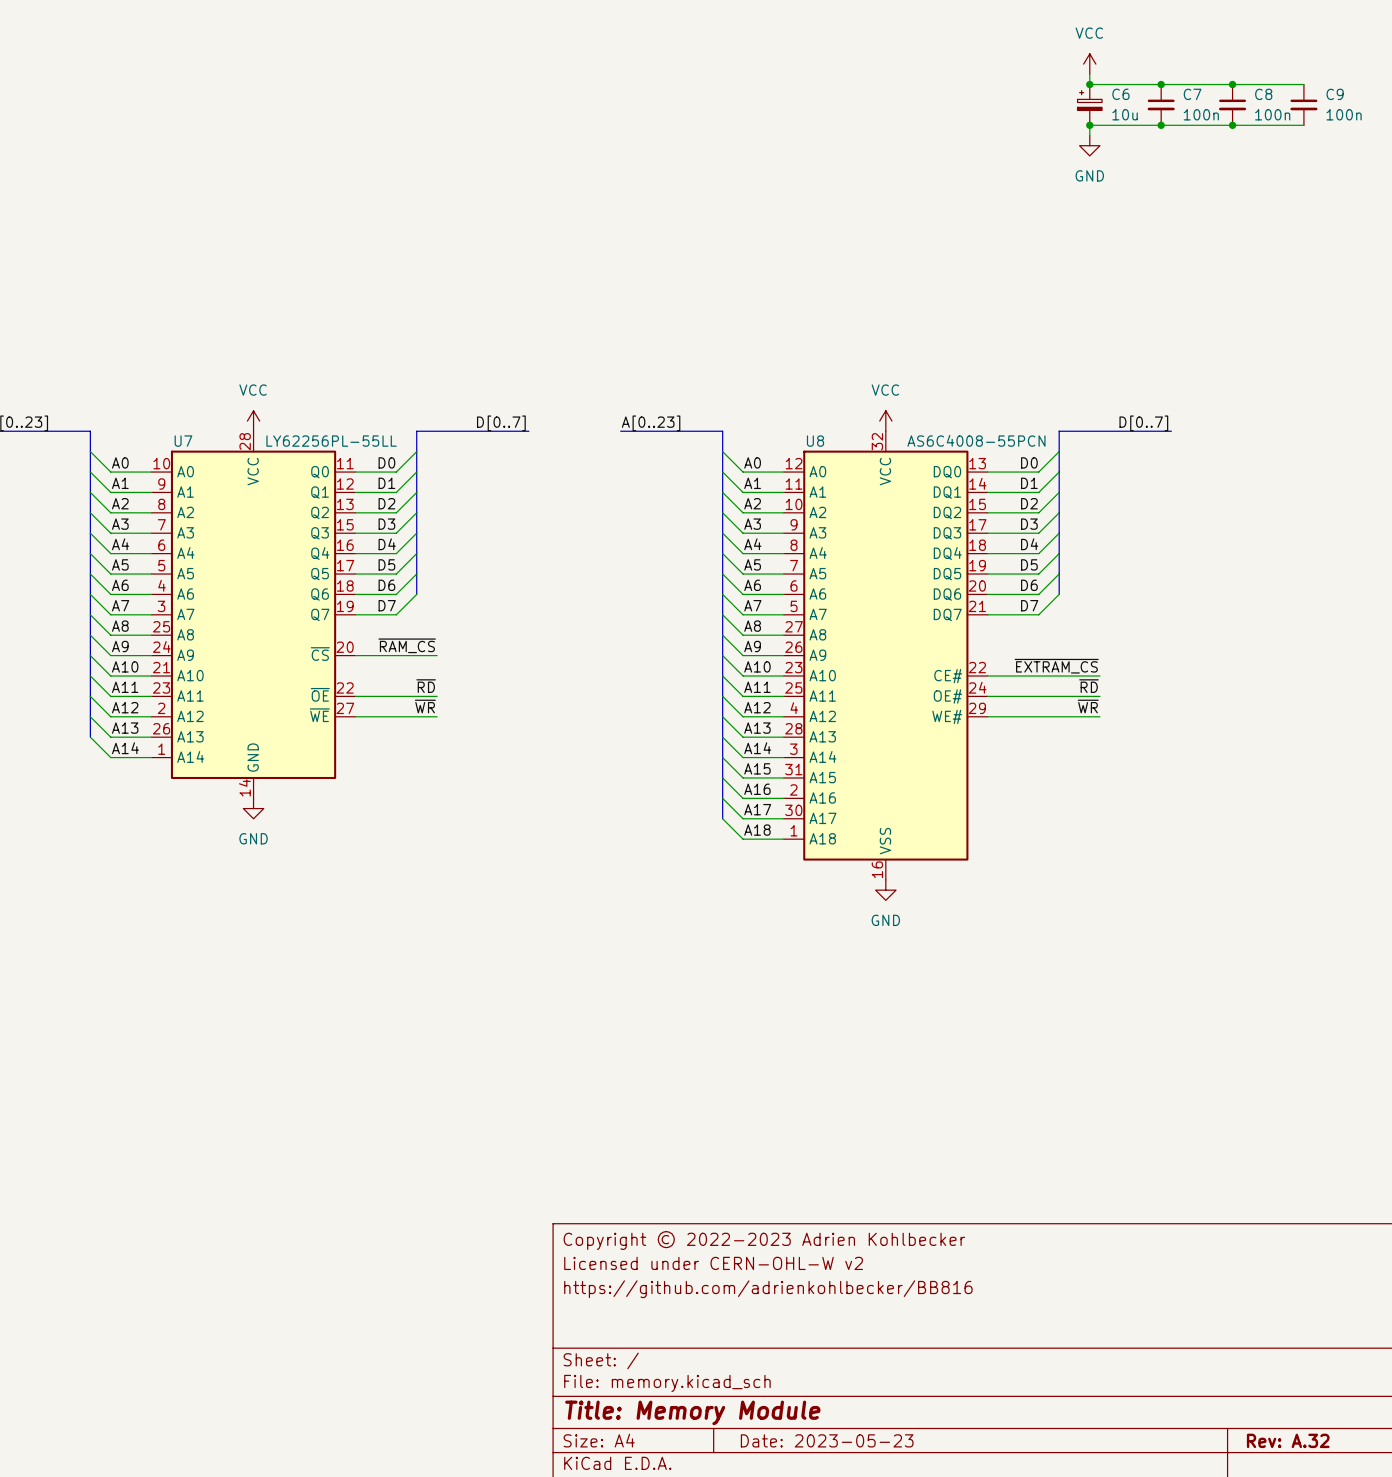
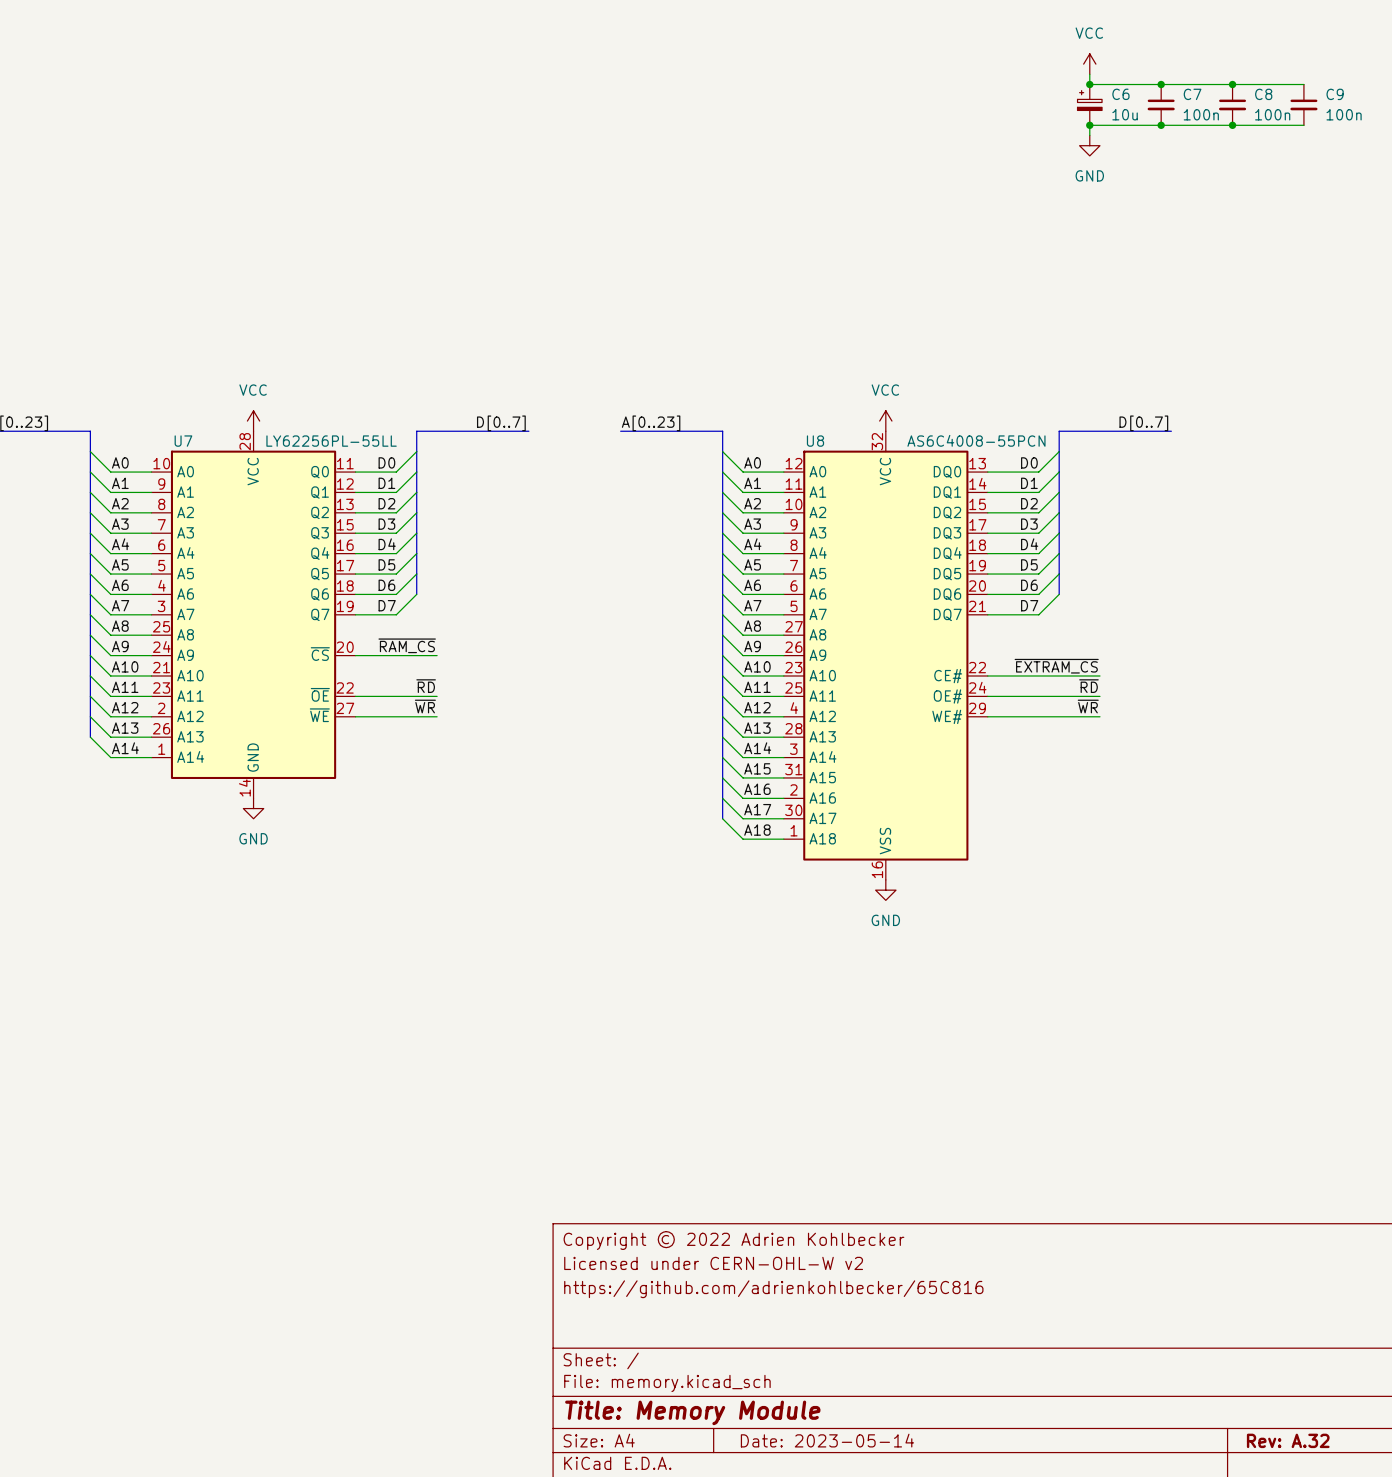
title block: Copyright © 2022-2023 Adrien Kohlbecker (764, 1240) -> Copyright © 2022 Adrien Kohlbecker (733, 1240)
title block: https://github.com/adrienkohlbecker/BB816 (768, 1289) -> https://github.com/adrienkohlbecker/65C816 (773, 1289)
title block: Date: 2023-05-23 (827, 1440) -> Date: 2023-05-14 (827, 1440)

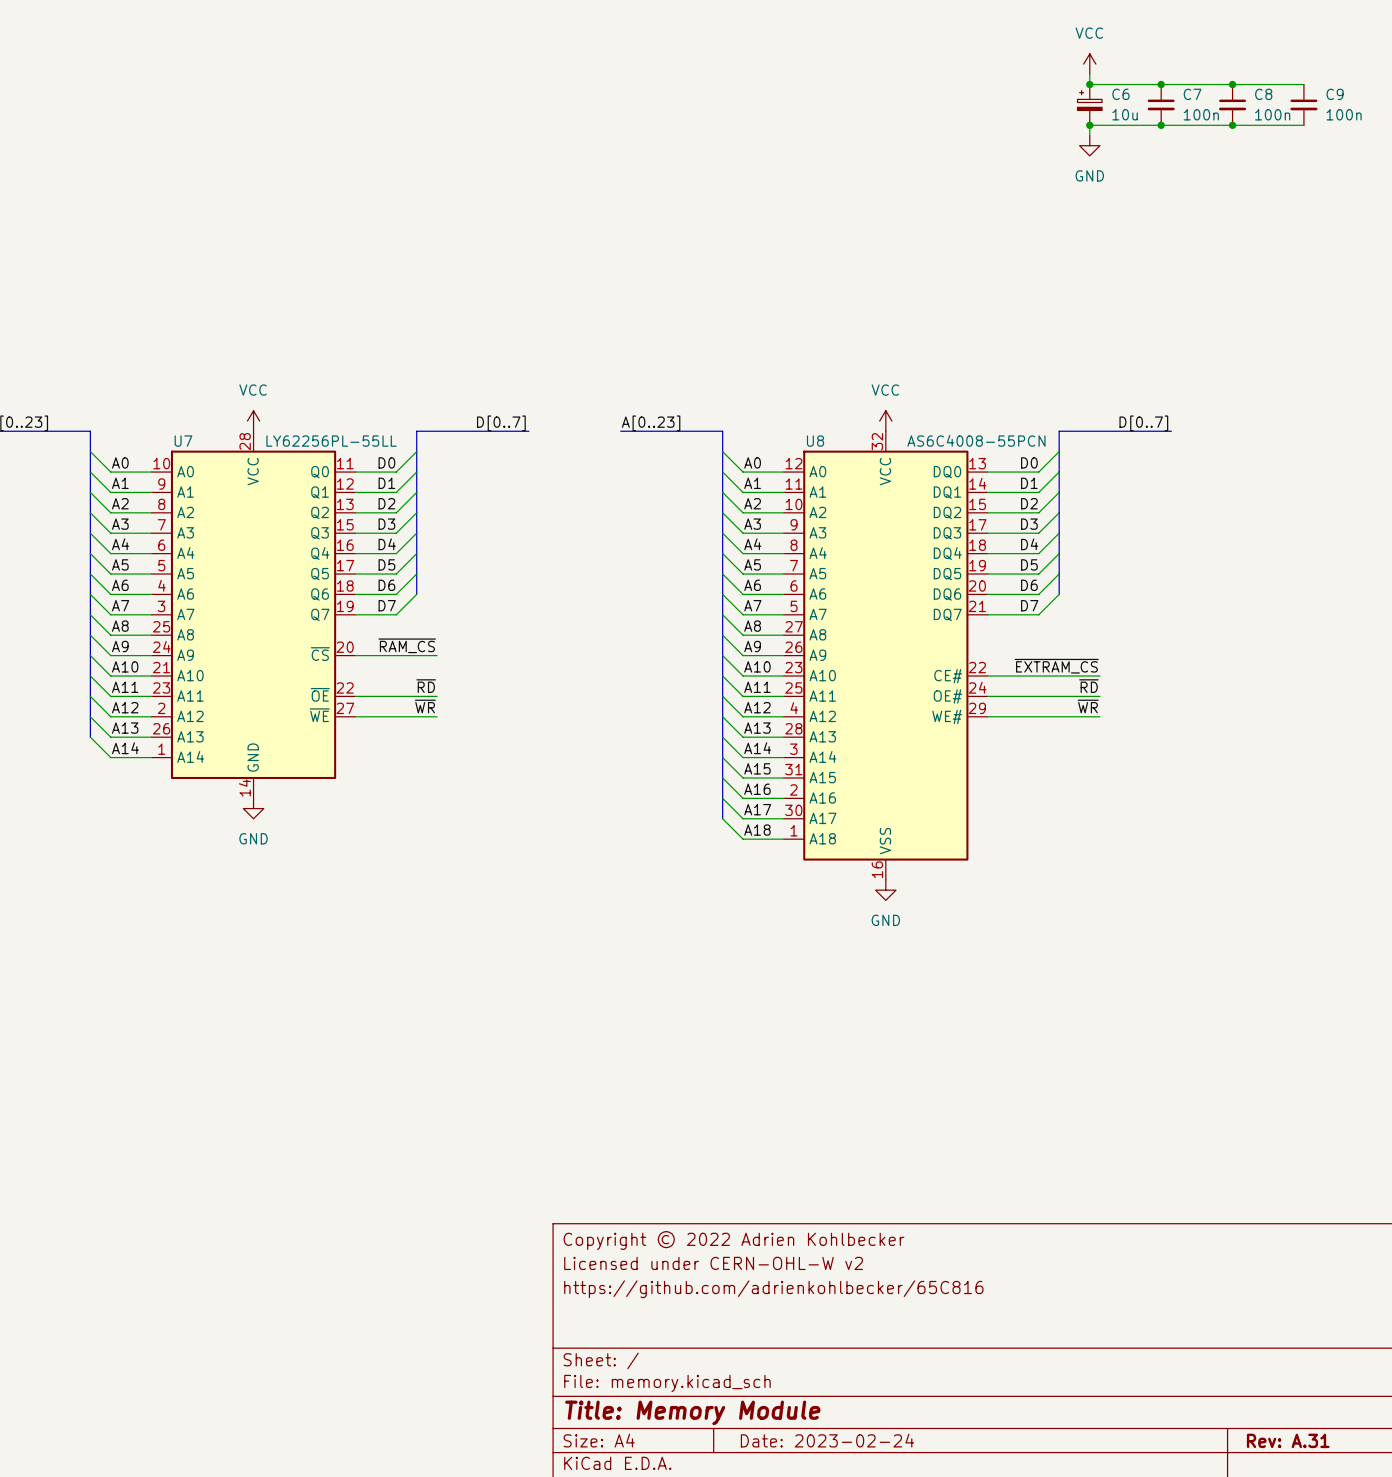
title block: Date: 2023-05-14 (827, 1440) -> Date: 2023-02-24 (827, 1440)
title block: Rev: A.32 (1288, 1440) -> Rev: A.31 (1288, 1440)

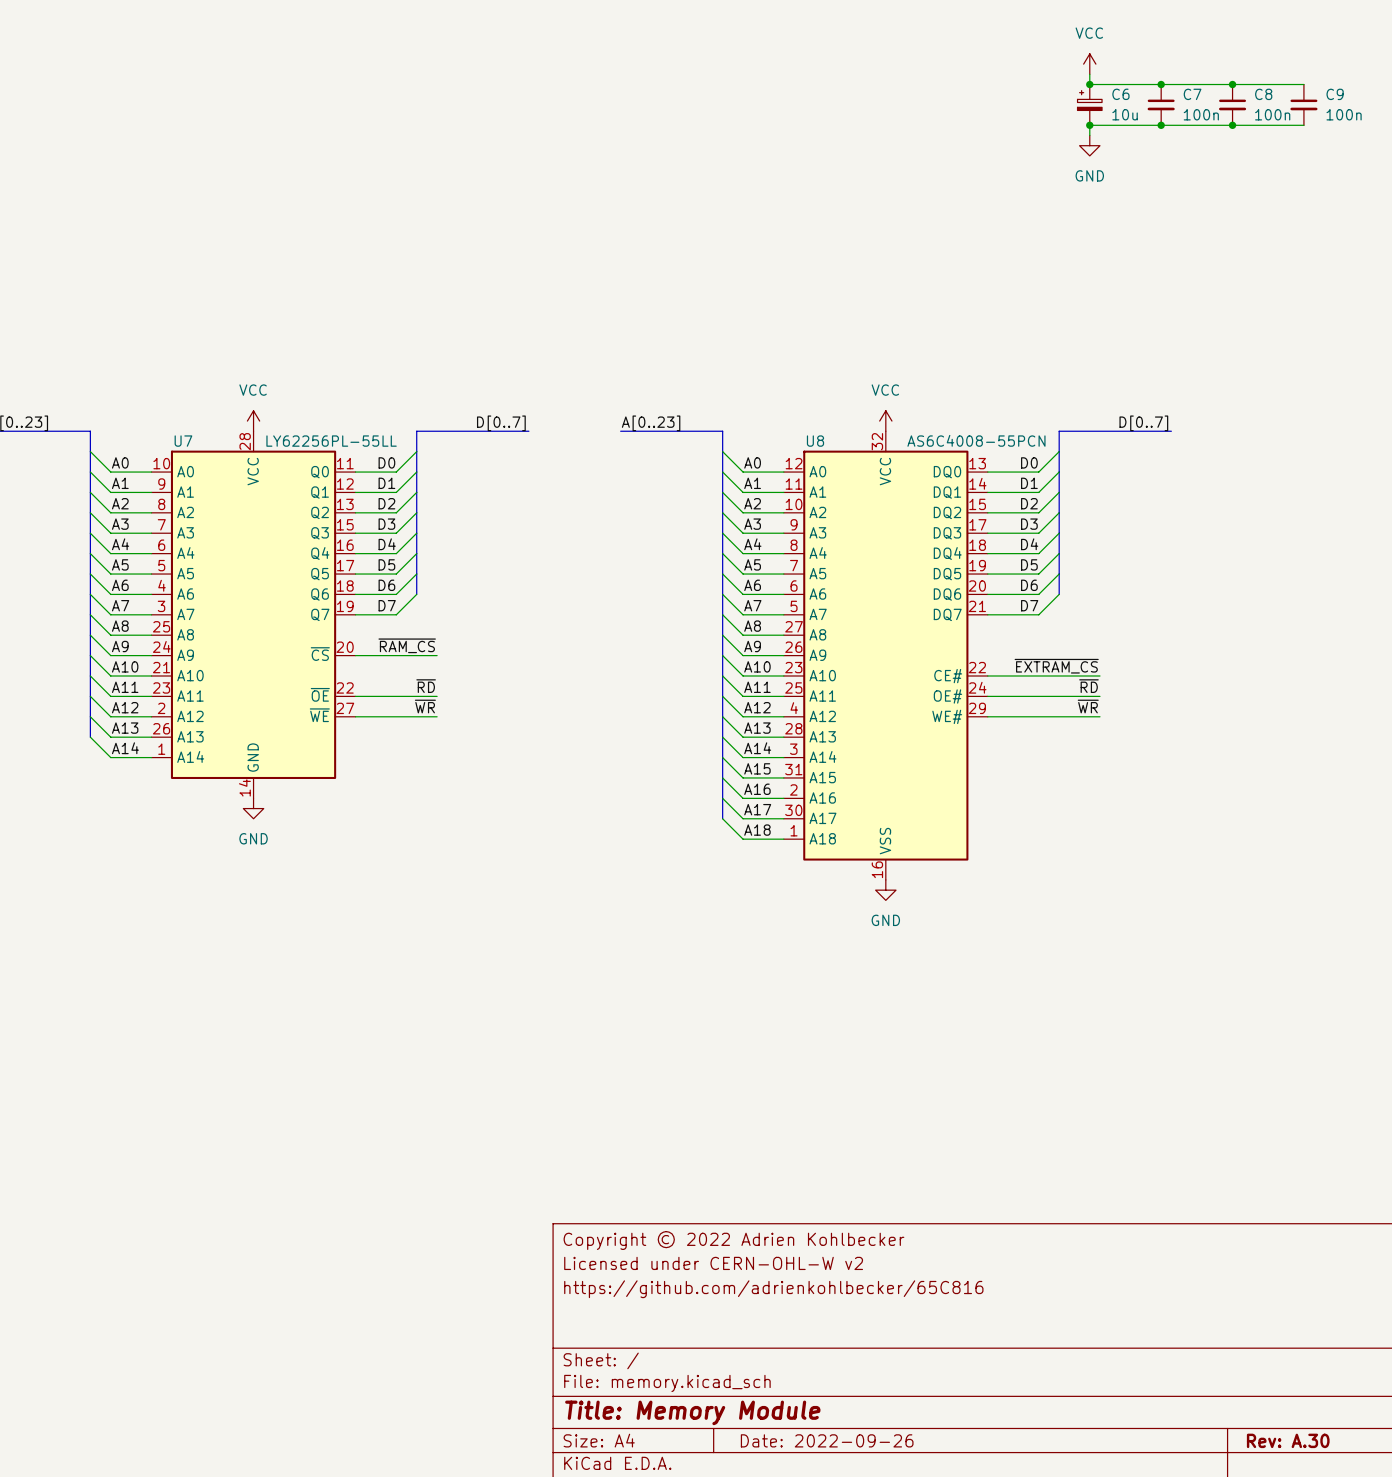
title block: Date: 2023-02-24 (827, 1440) -> Date: 2022-09-26 (827, 1440)
title block: Rev: A.31 (1288, 1440) -> Rev: A.30 (1288, 1440)

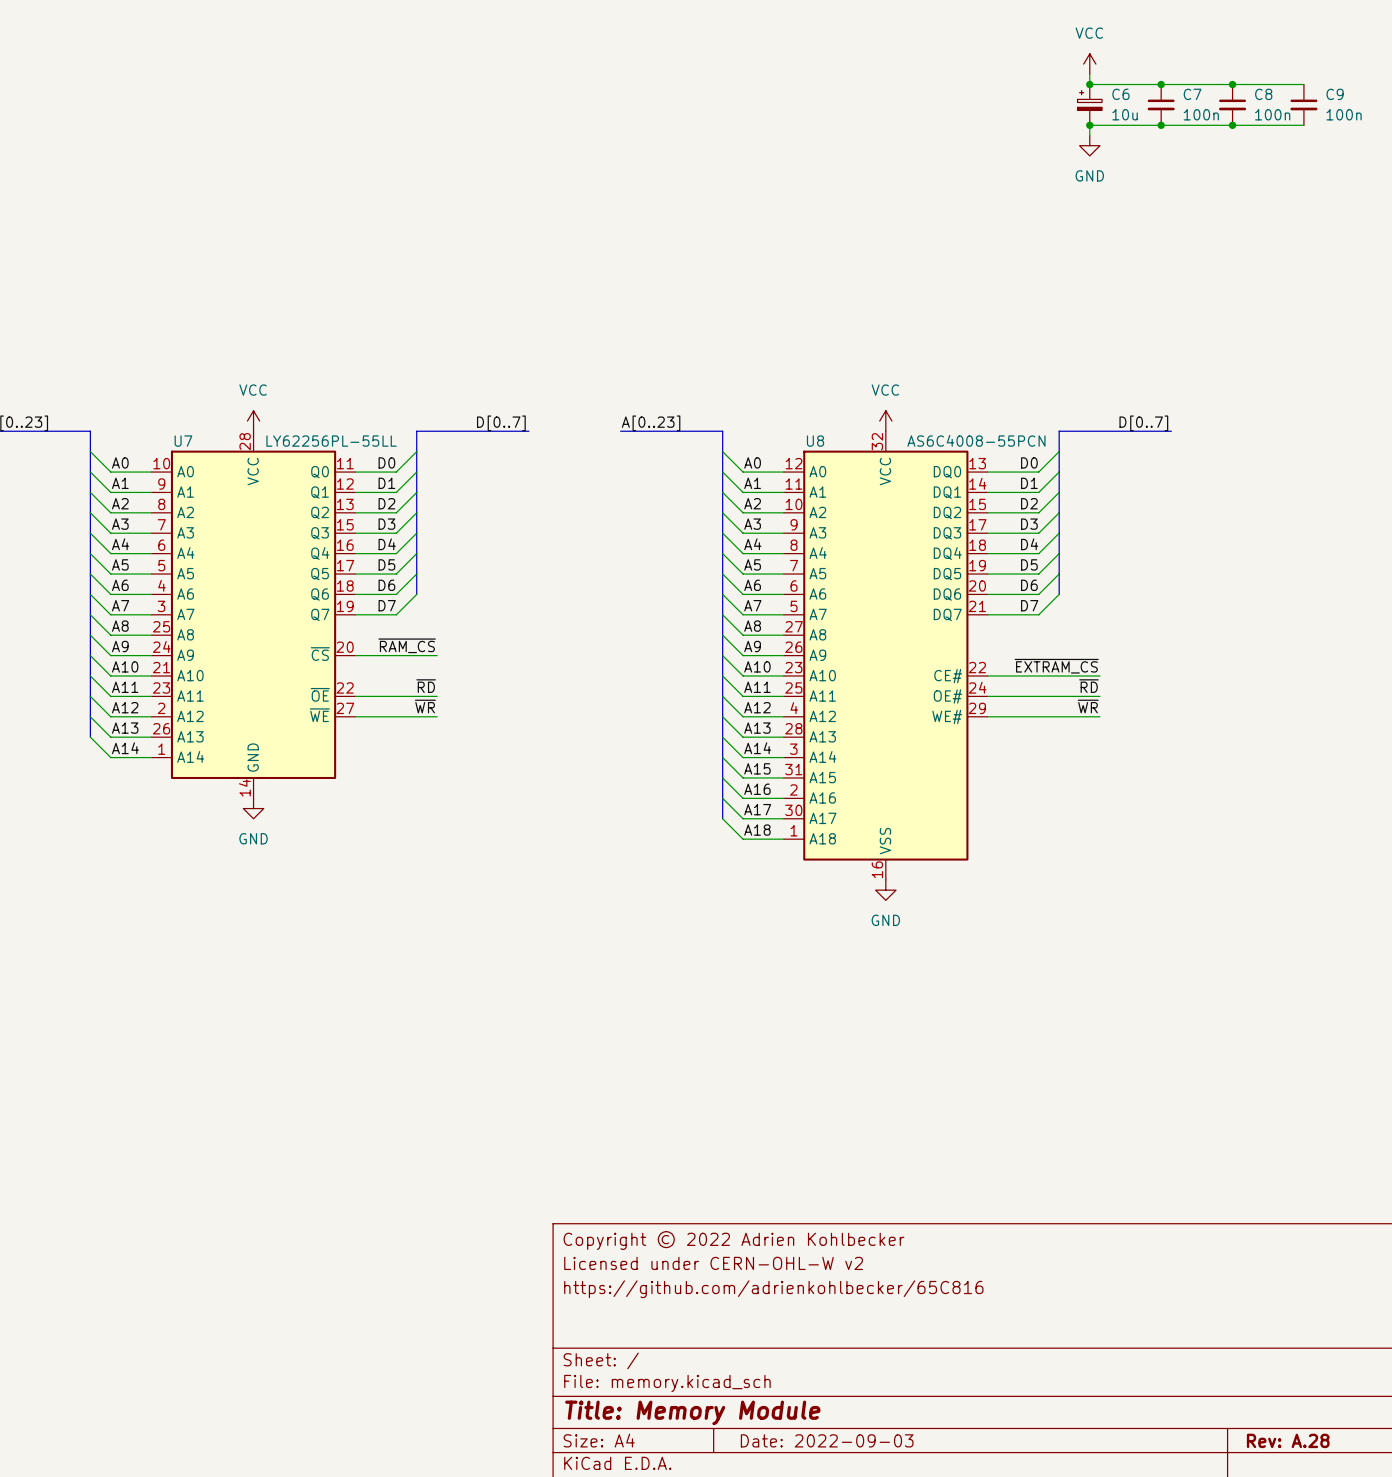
title block: Date: 2022-09-26 (827, 1440) -> Date: 2022-09-03 (827, 1440)
title block: Rev: A.30 (1288, 1440) -> Rev: A.28 (1288, 1440)

